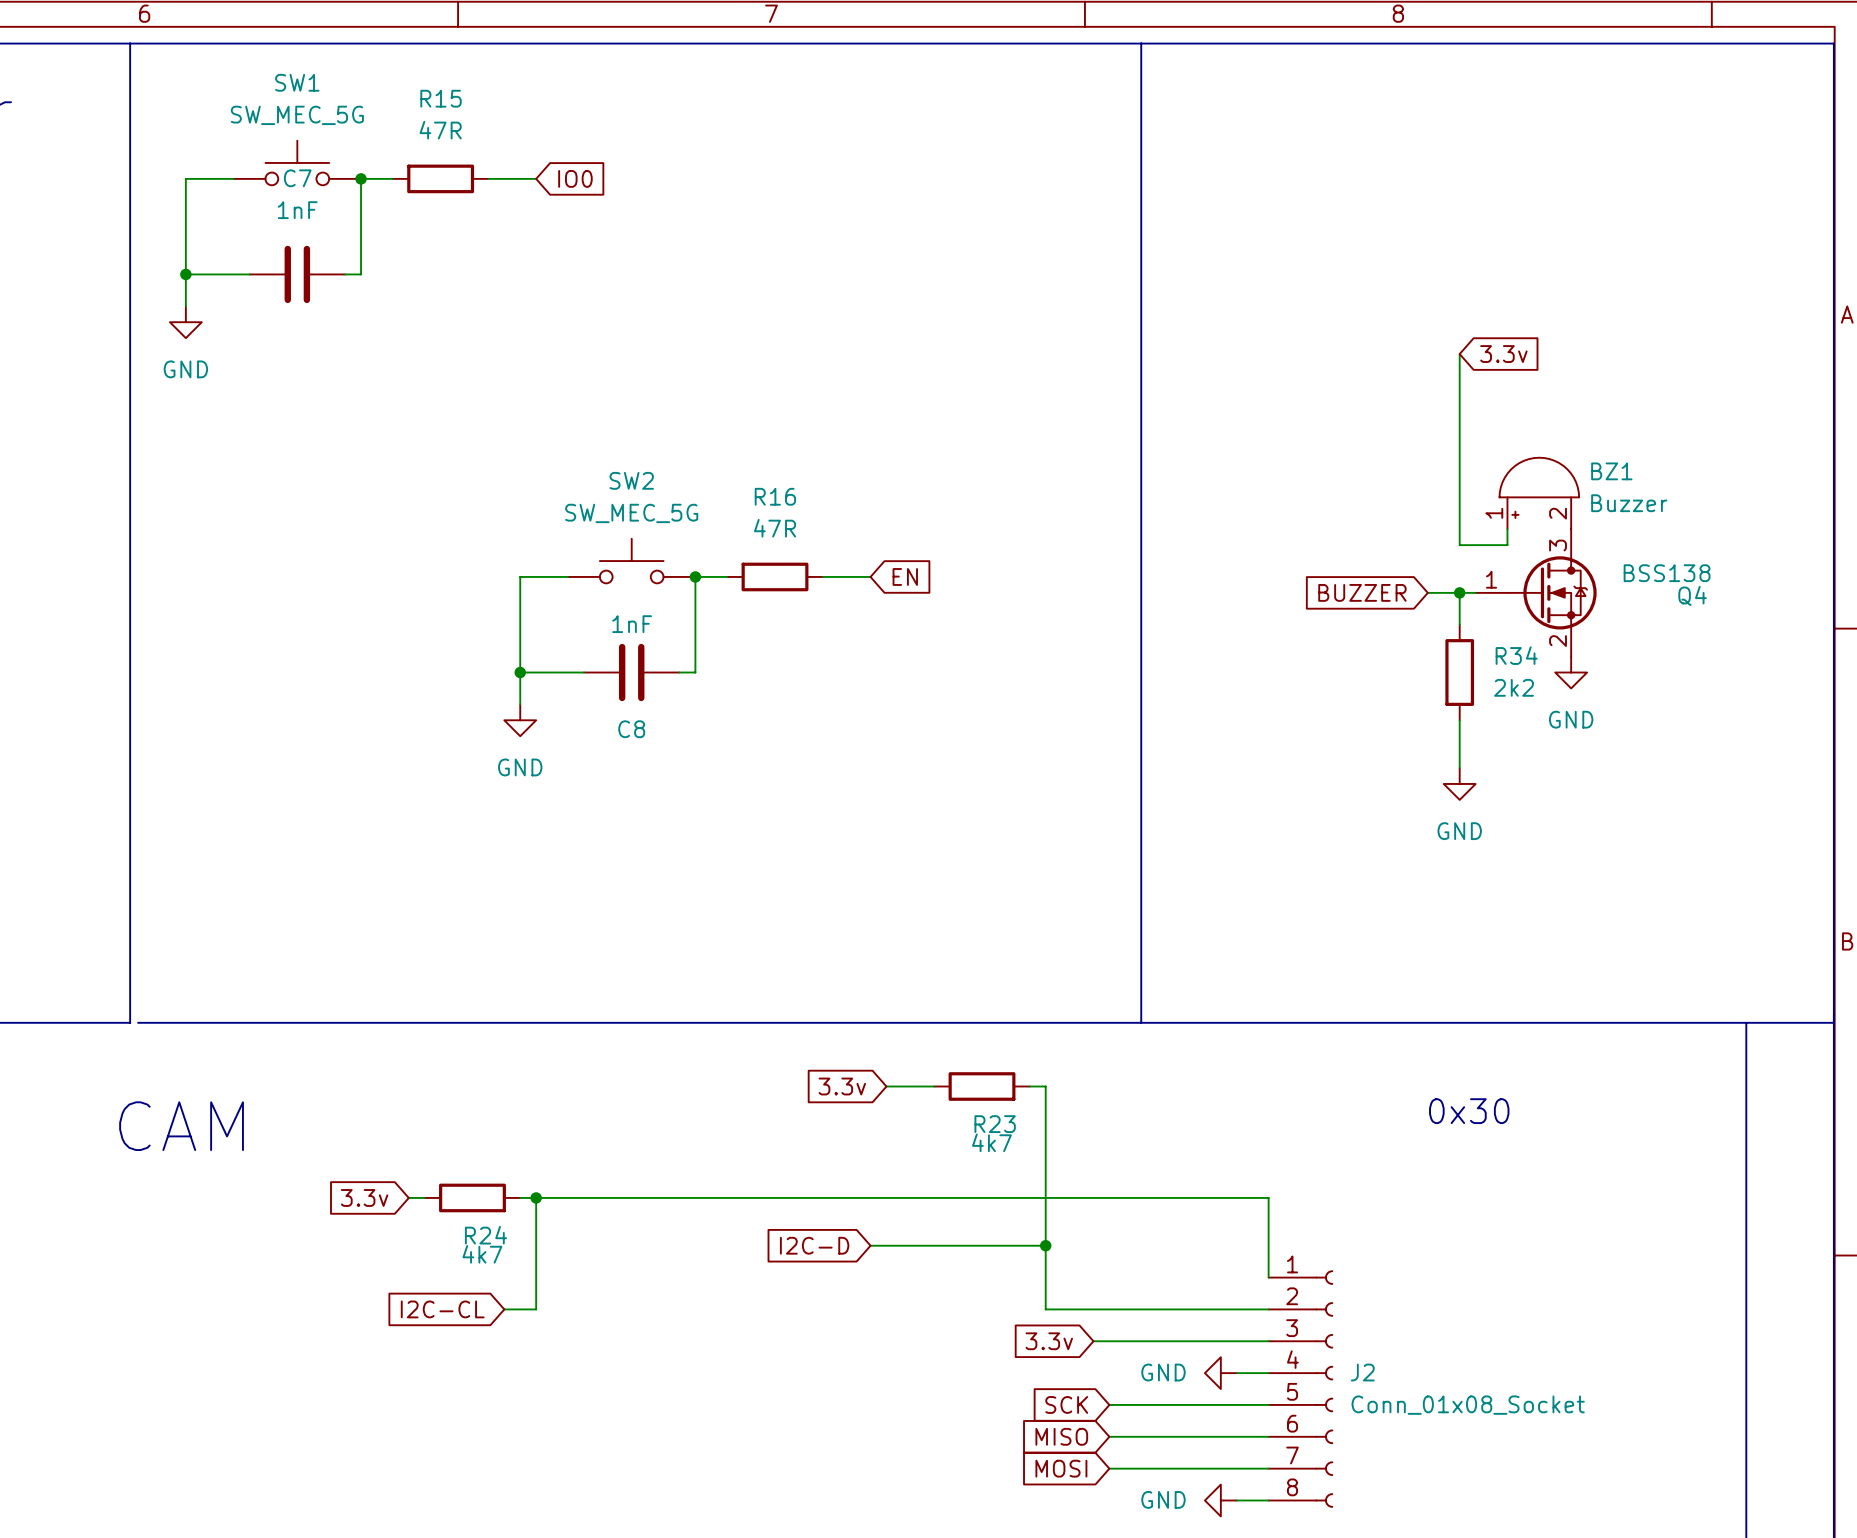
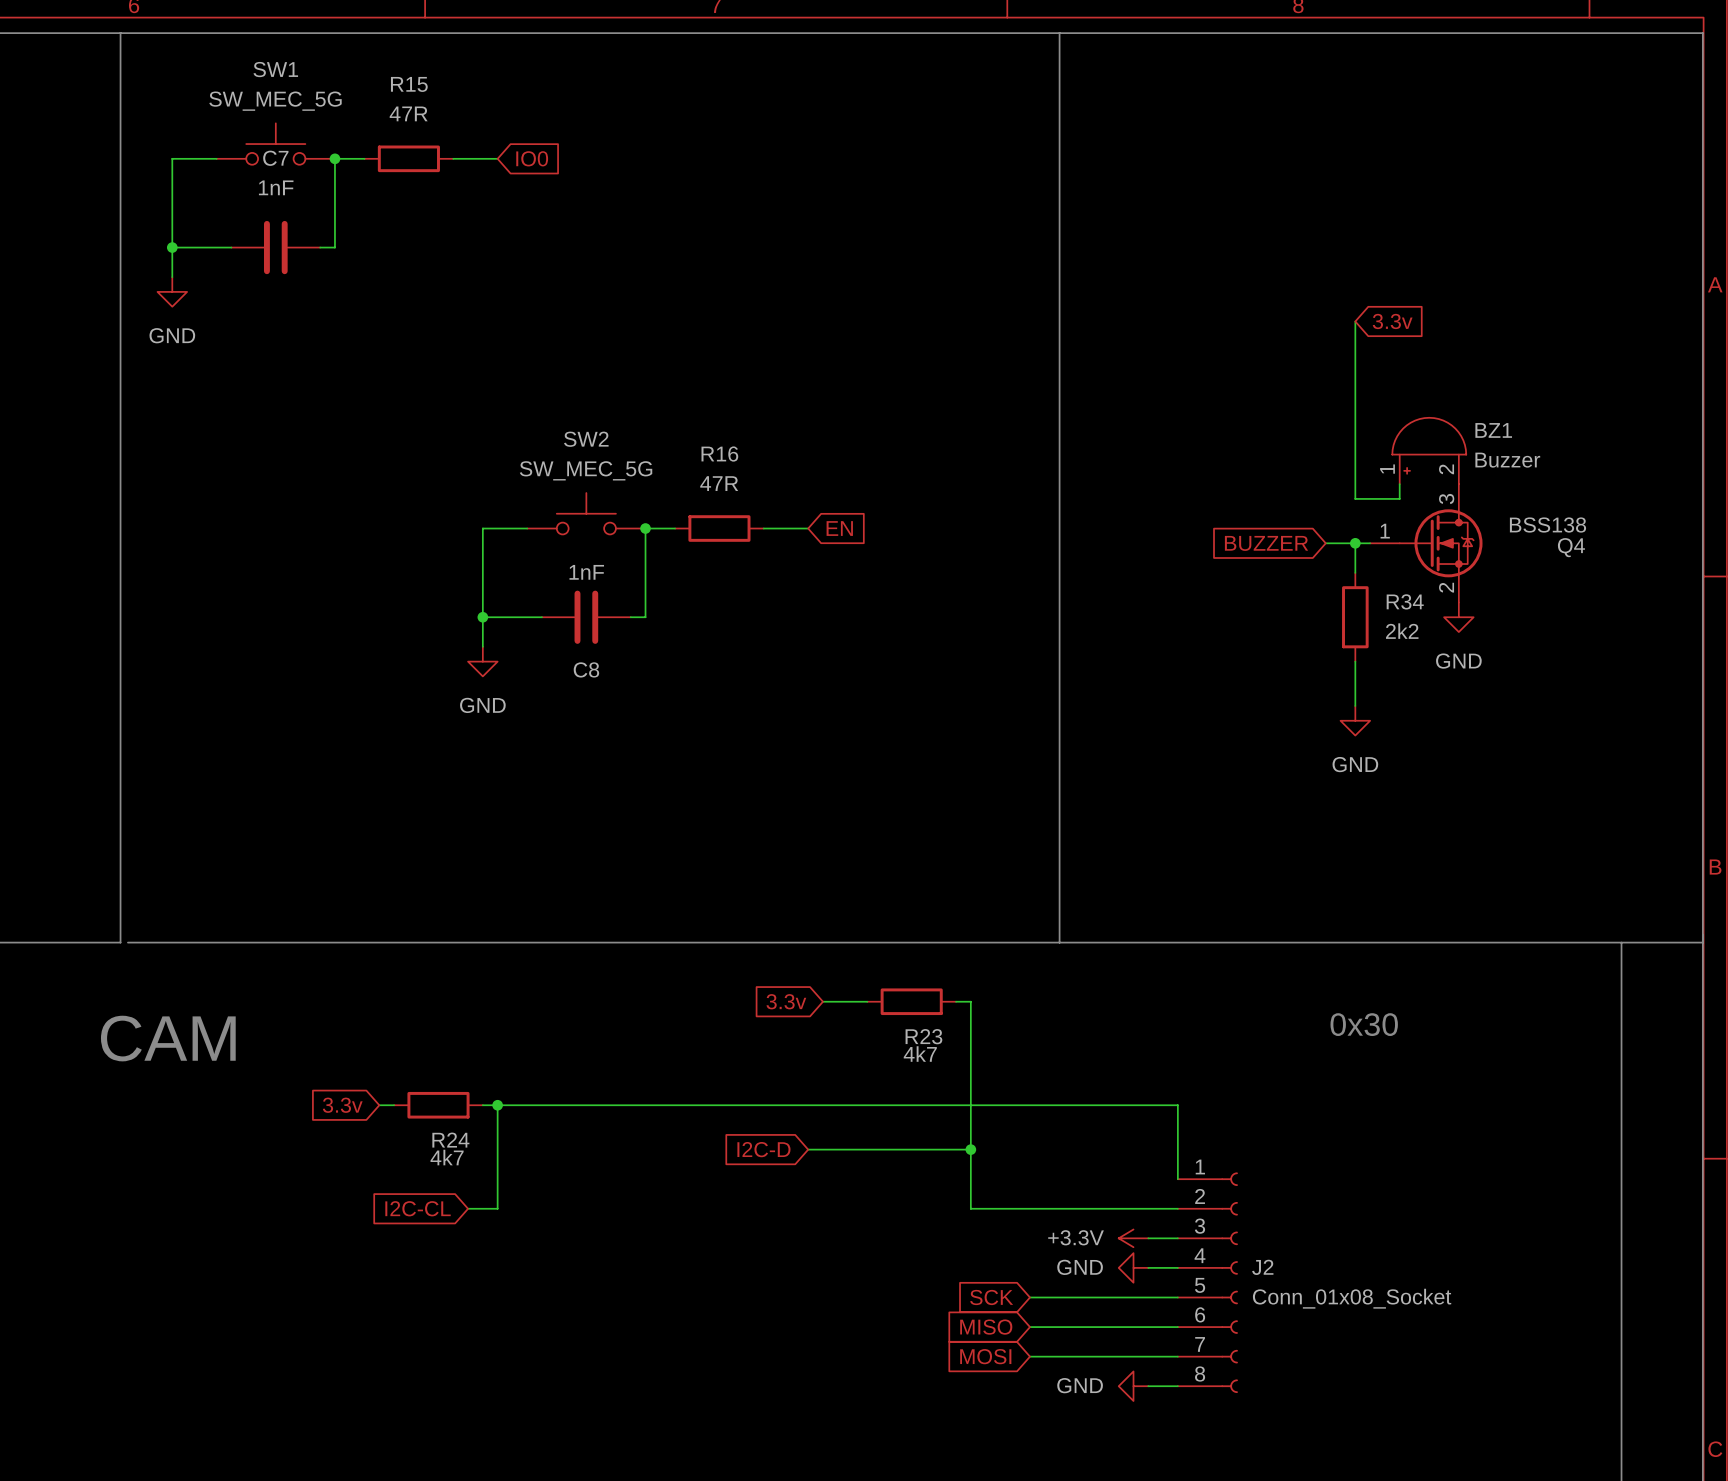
global label: 3.3v (1049, 1341) -> none
wire: (1093, 1341) (1236, 1341) -> none
power symbol: none -> +3.3V (1133, 1238)

